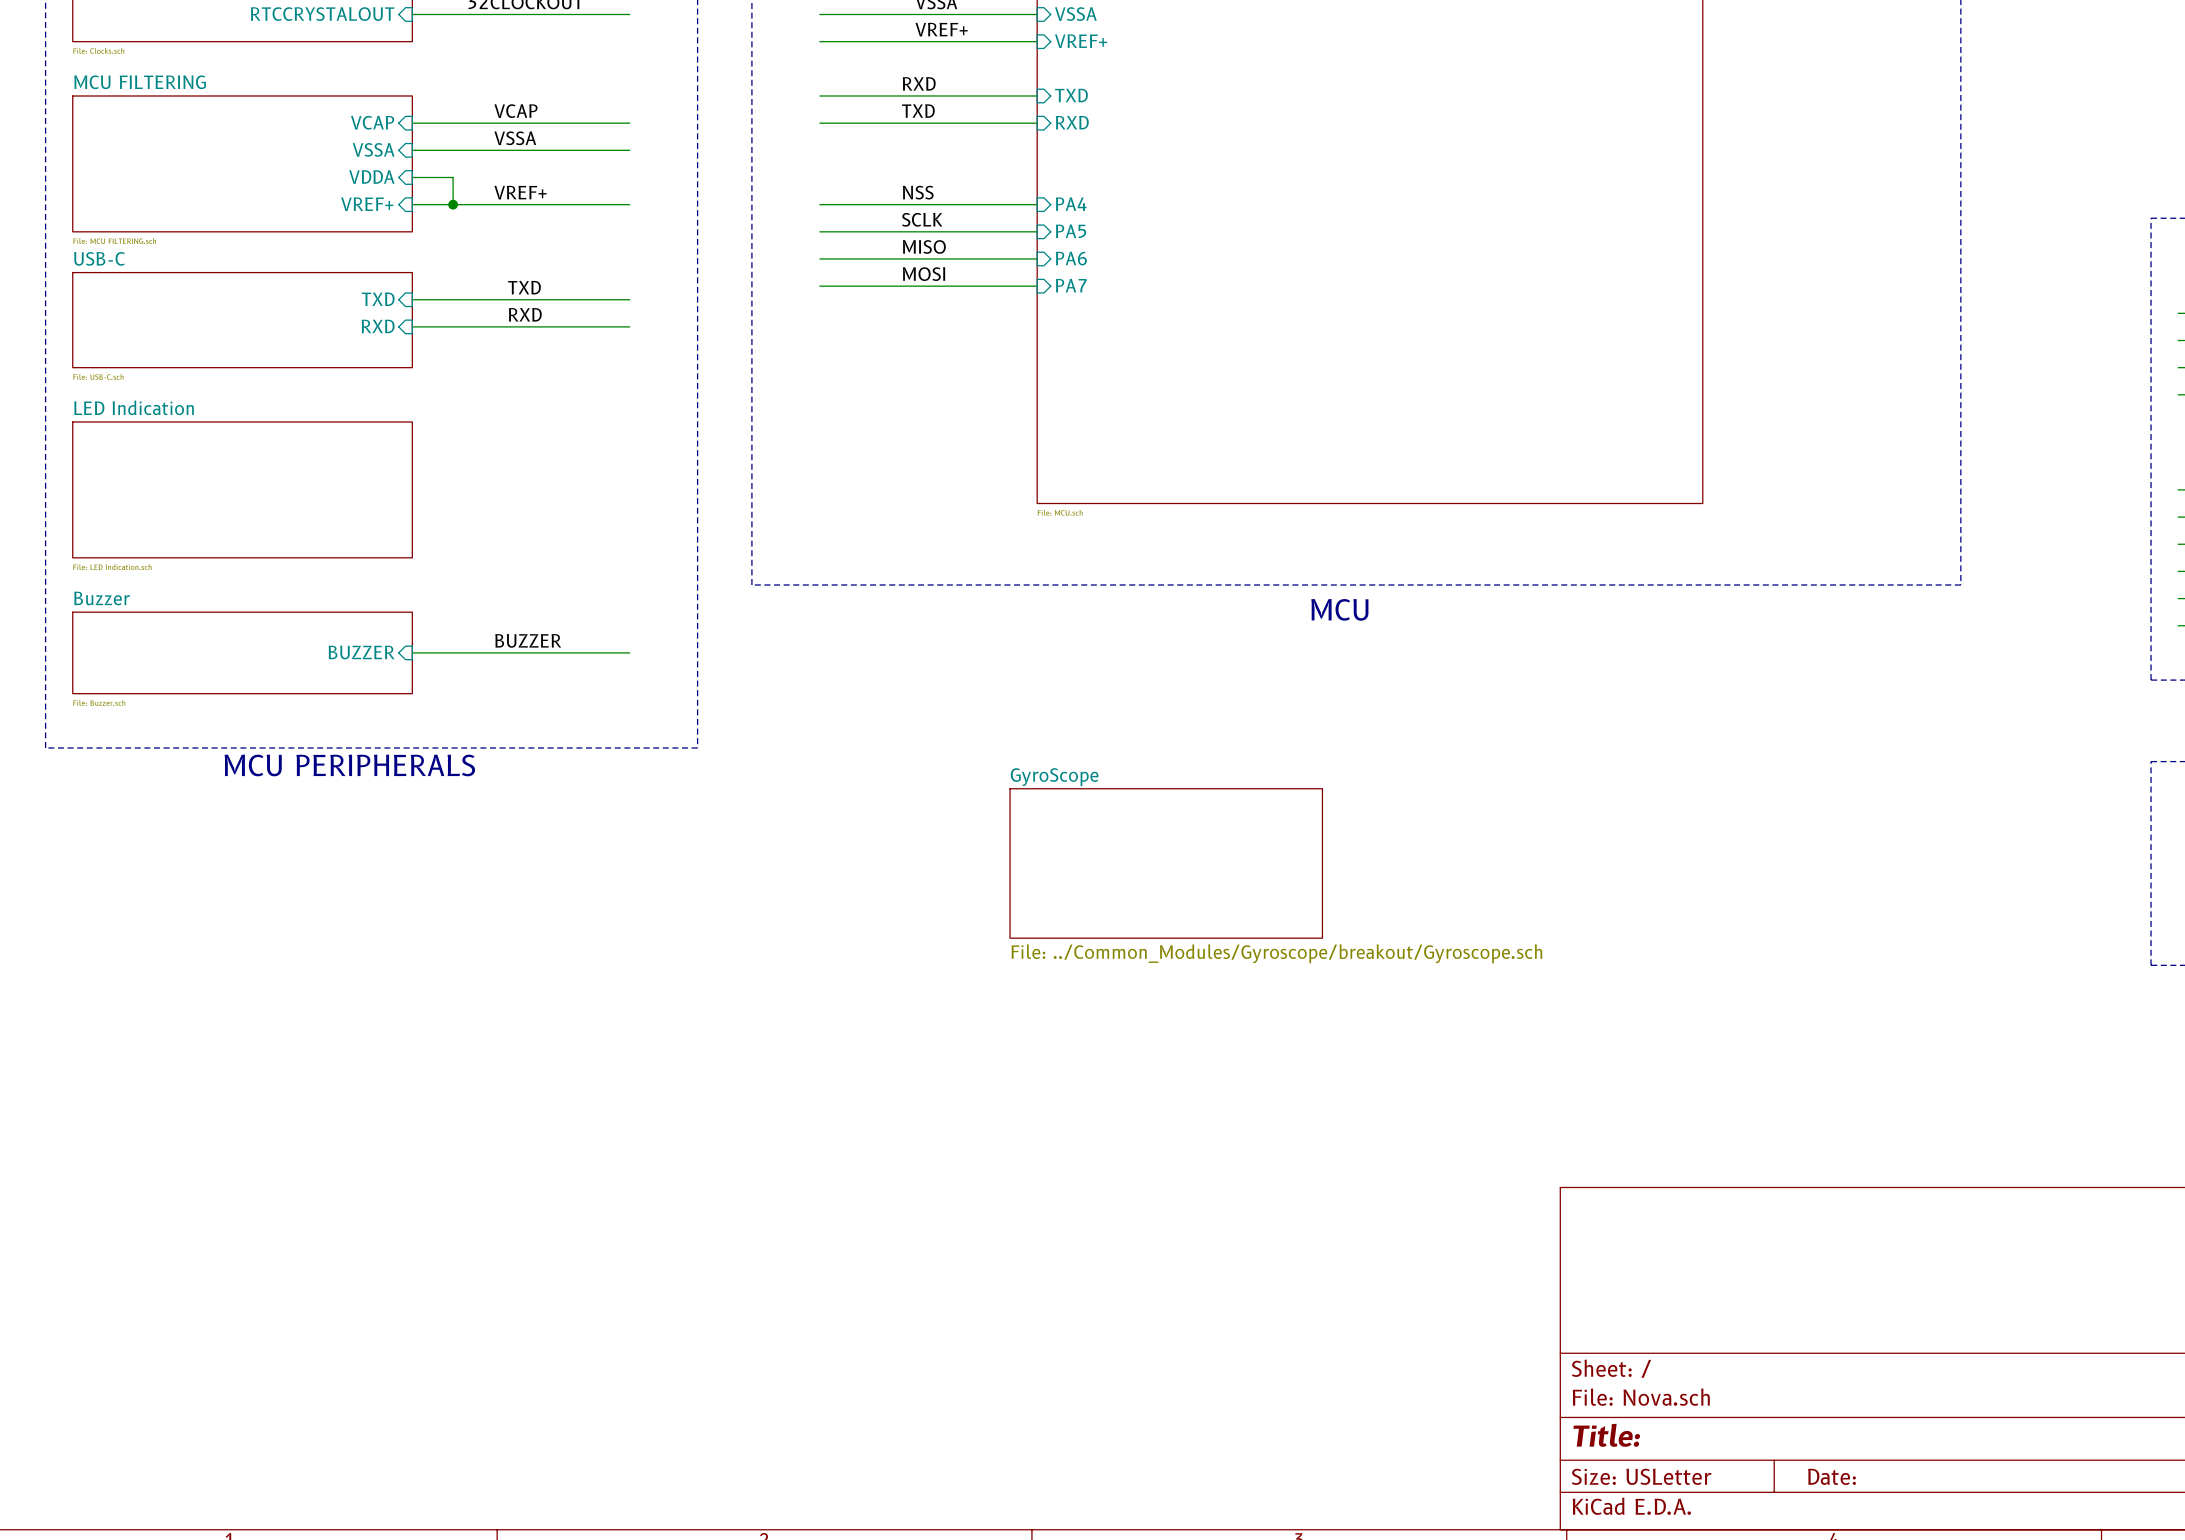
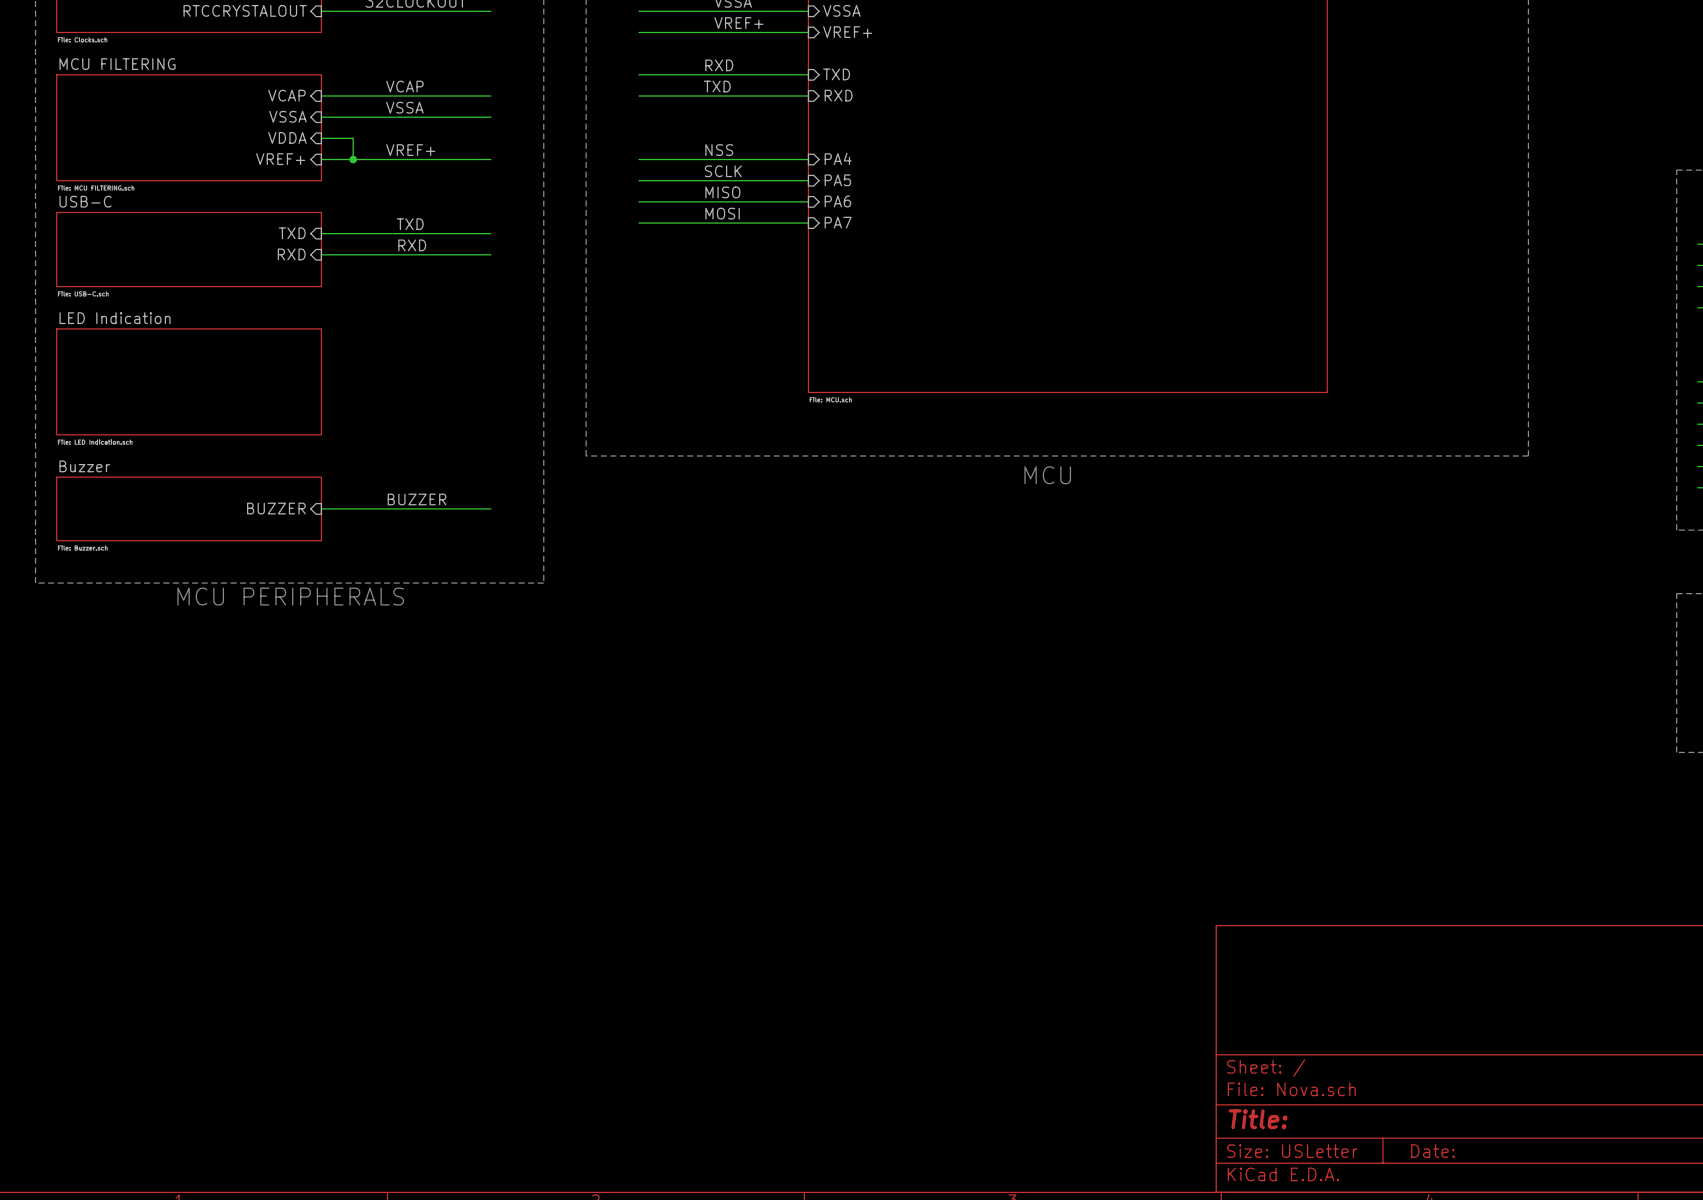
sheet GyroScope: File: ../Common_Modules/Gyroscope/breakout/Gyroscope.sch (1166, 863) -> none

